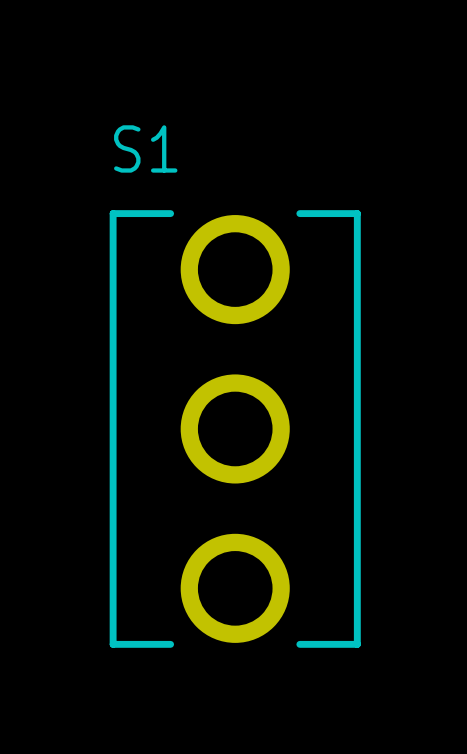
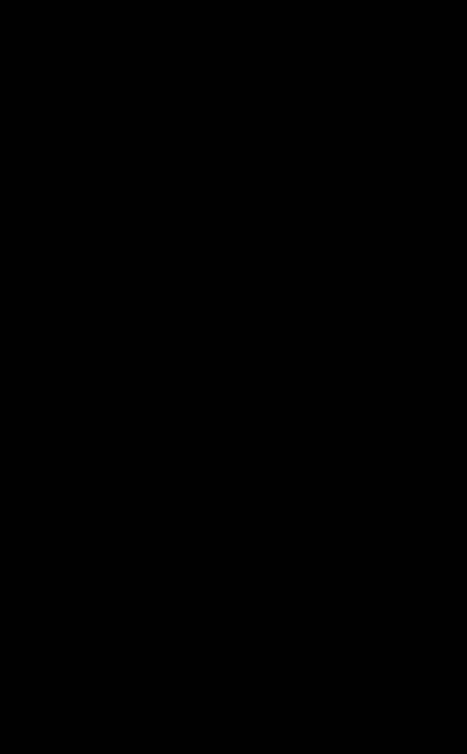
S1: (235, 428) -> none

